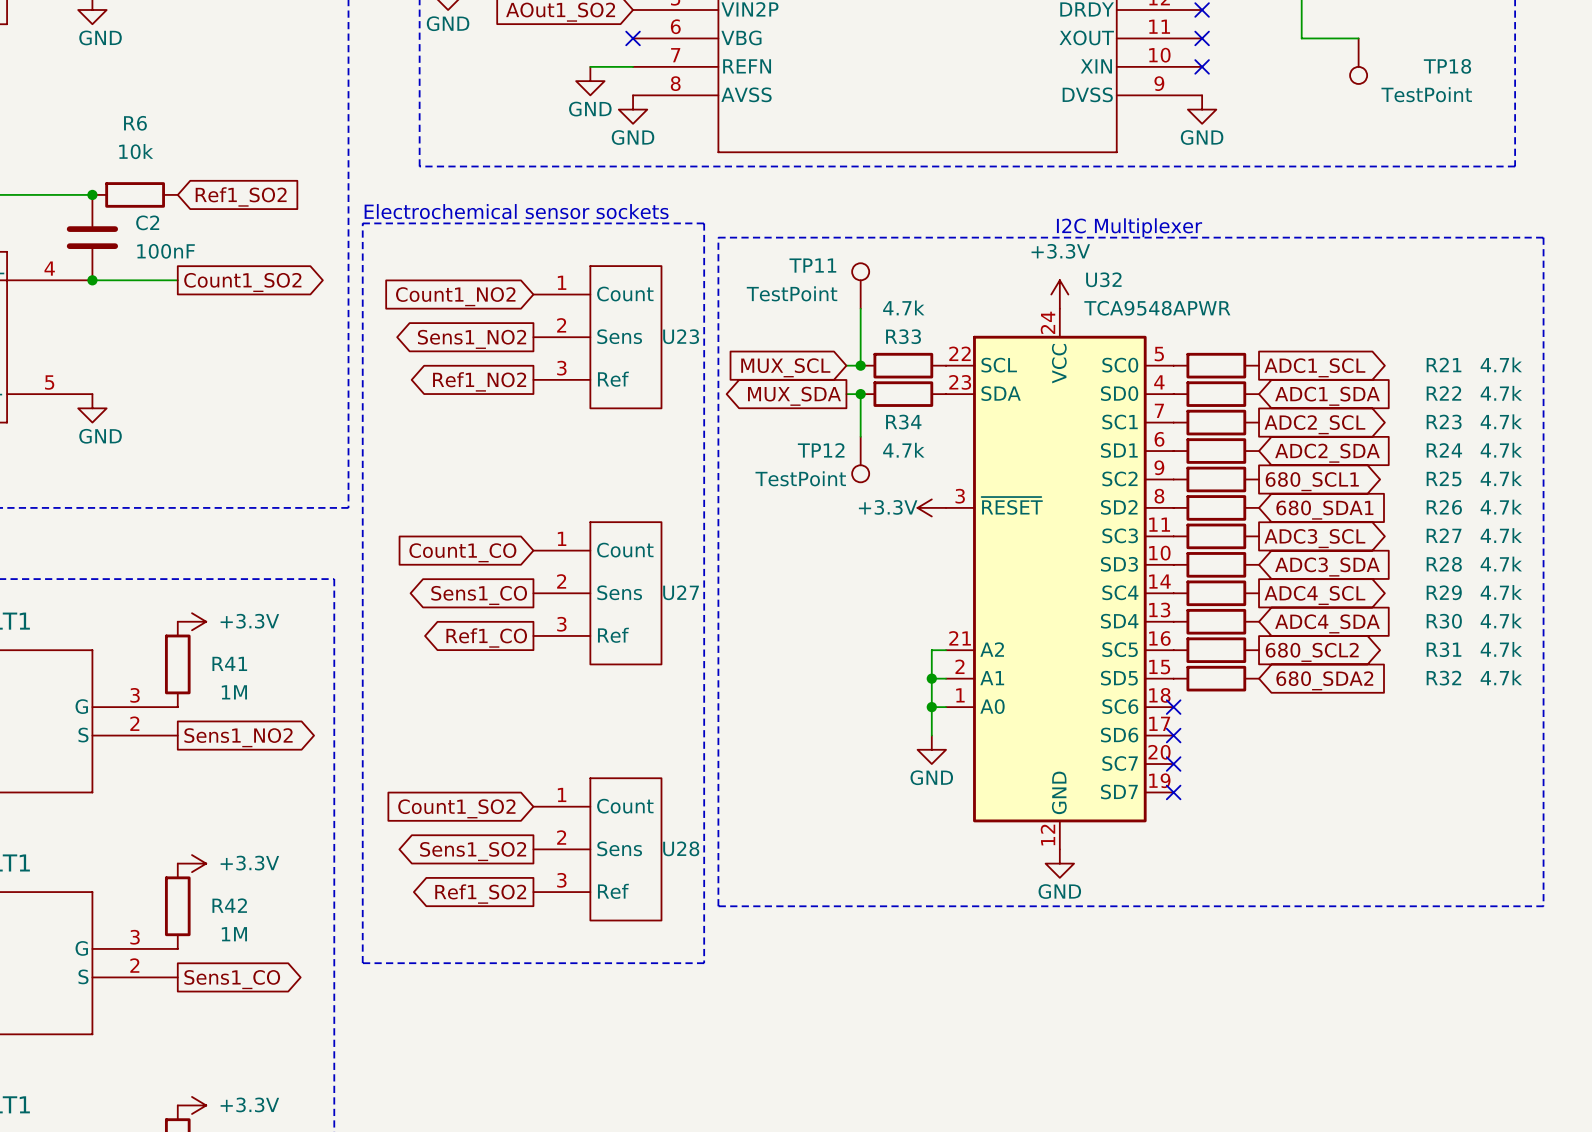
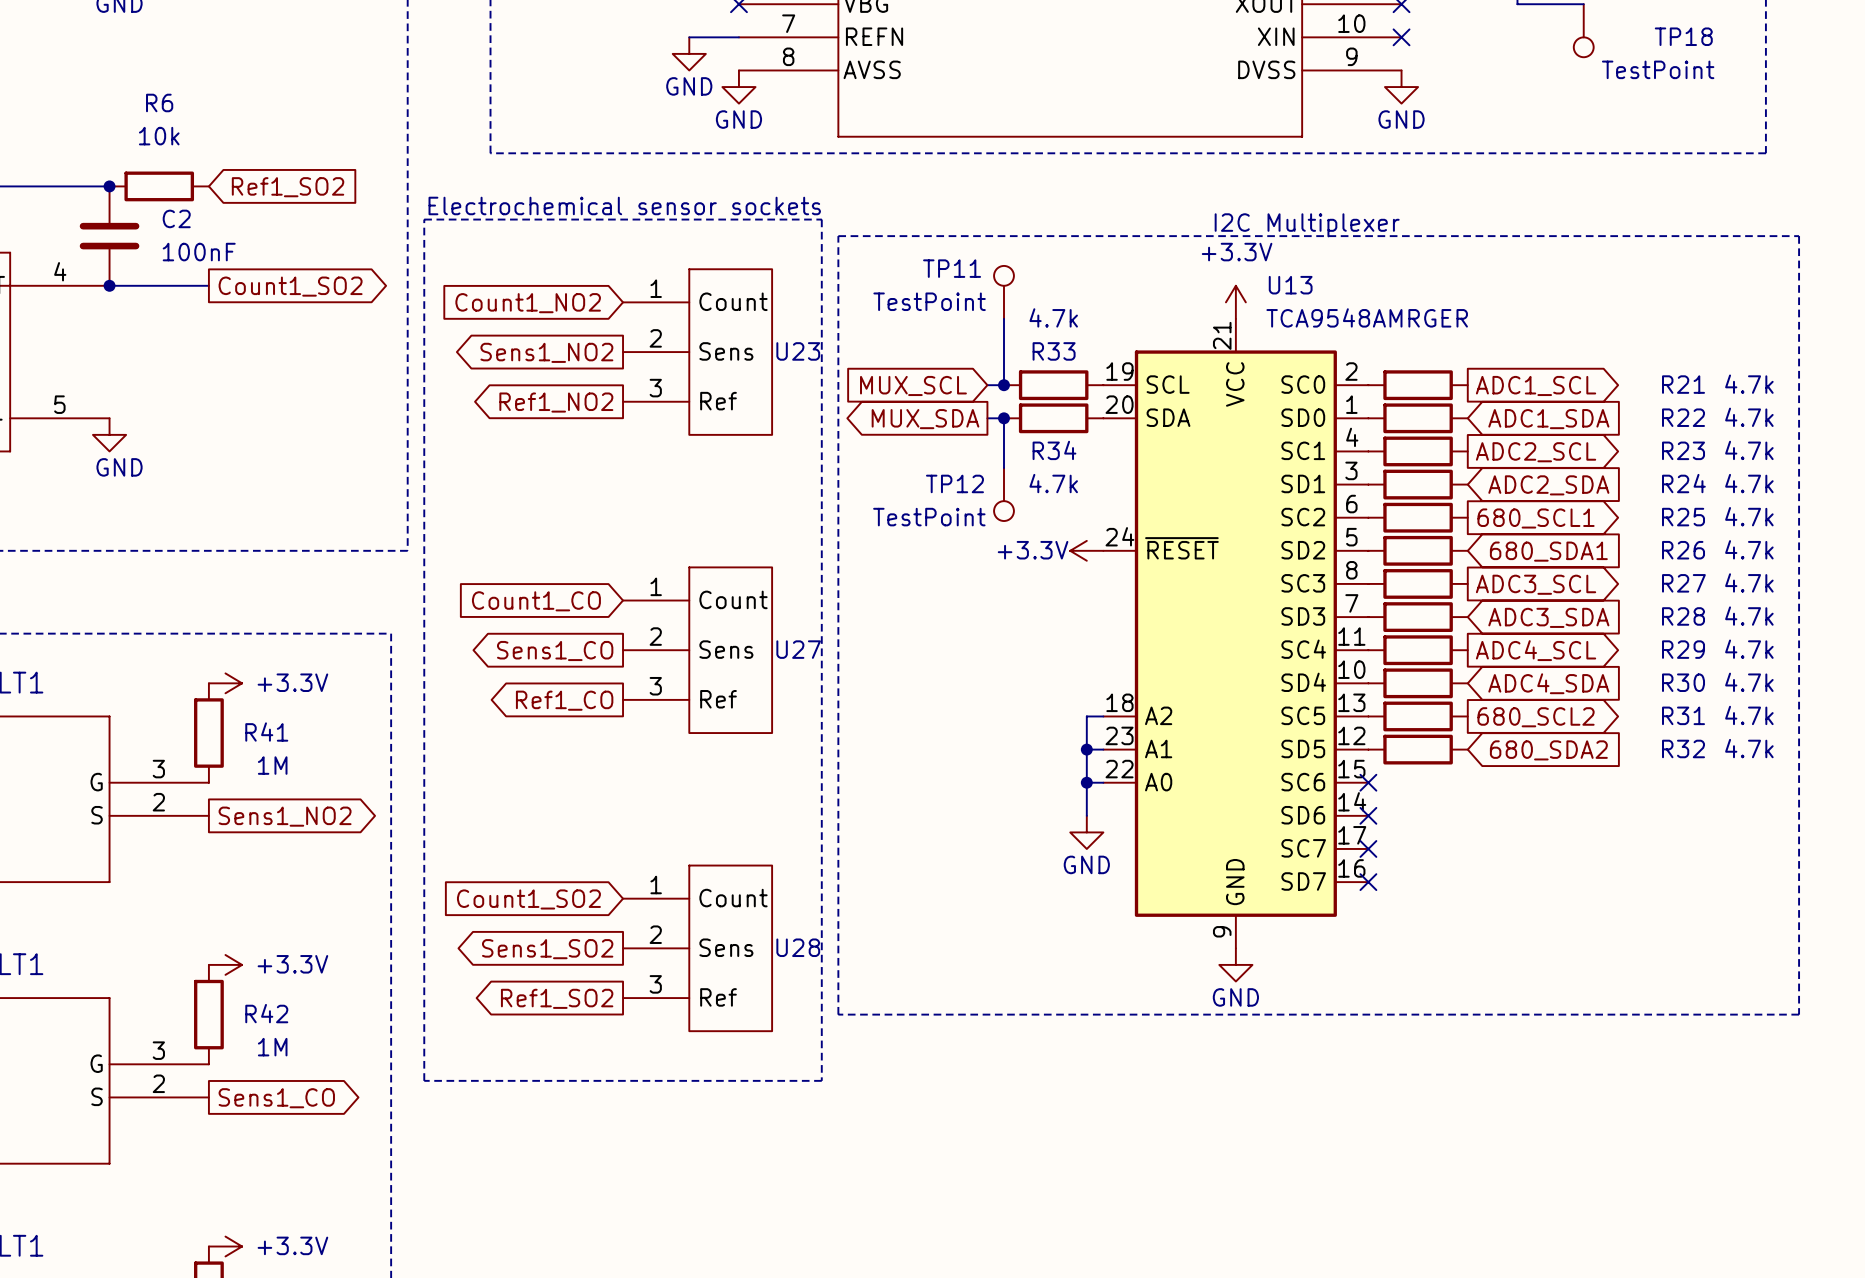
U32 name: U32 (1103, 279) -> U13 (1290, 285)
U32 symbol: [946, 308, 1174, 850] -> [1103, 318, 1369, 949]
U32 value: TCA9548APWR (1157, 308) -> TCA9548AMRGER (1367, 317)

